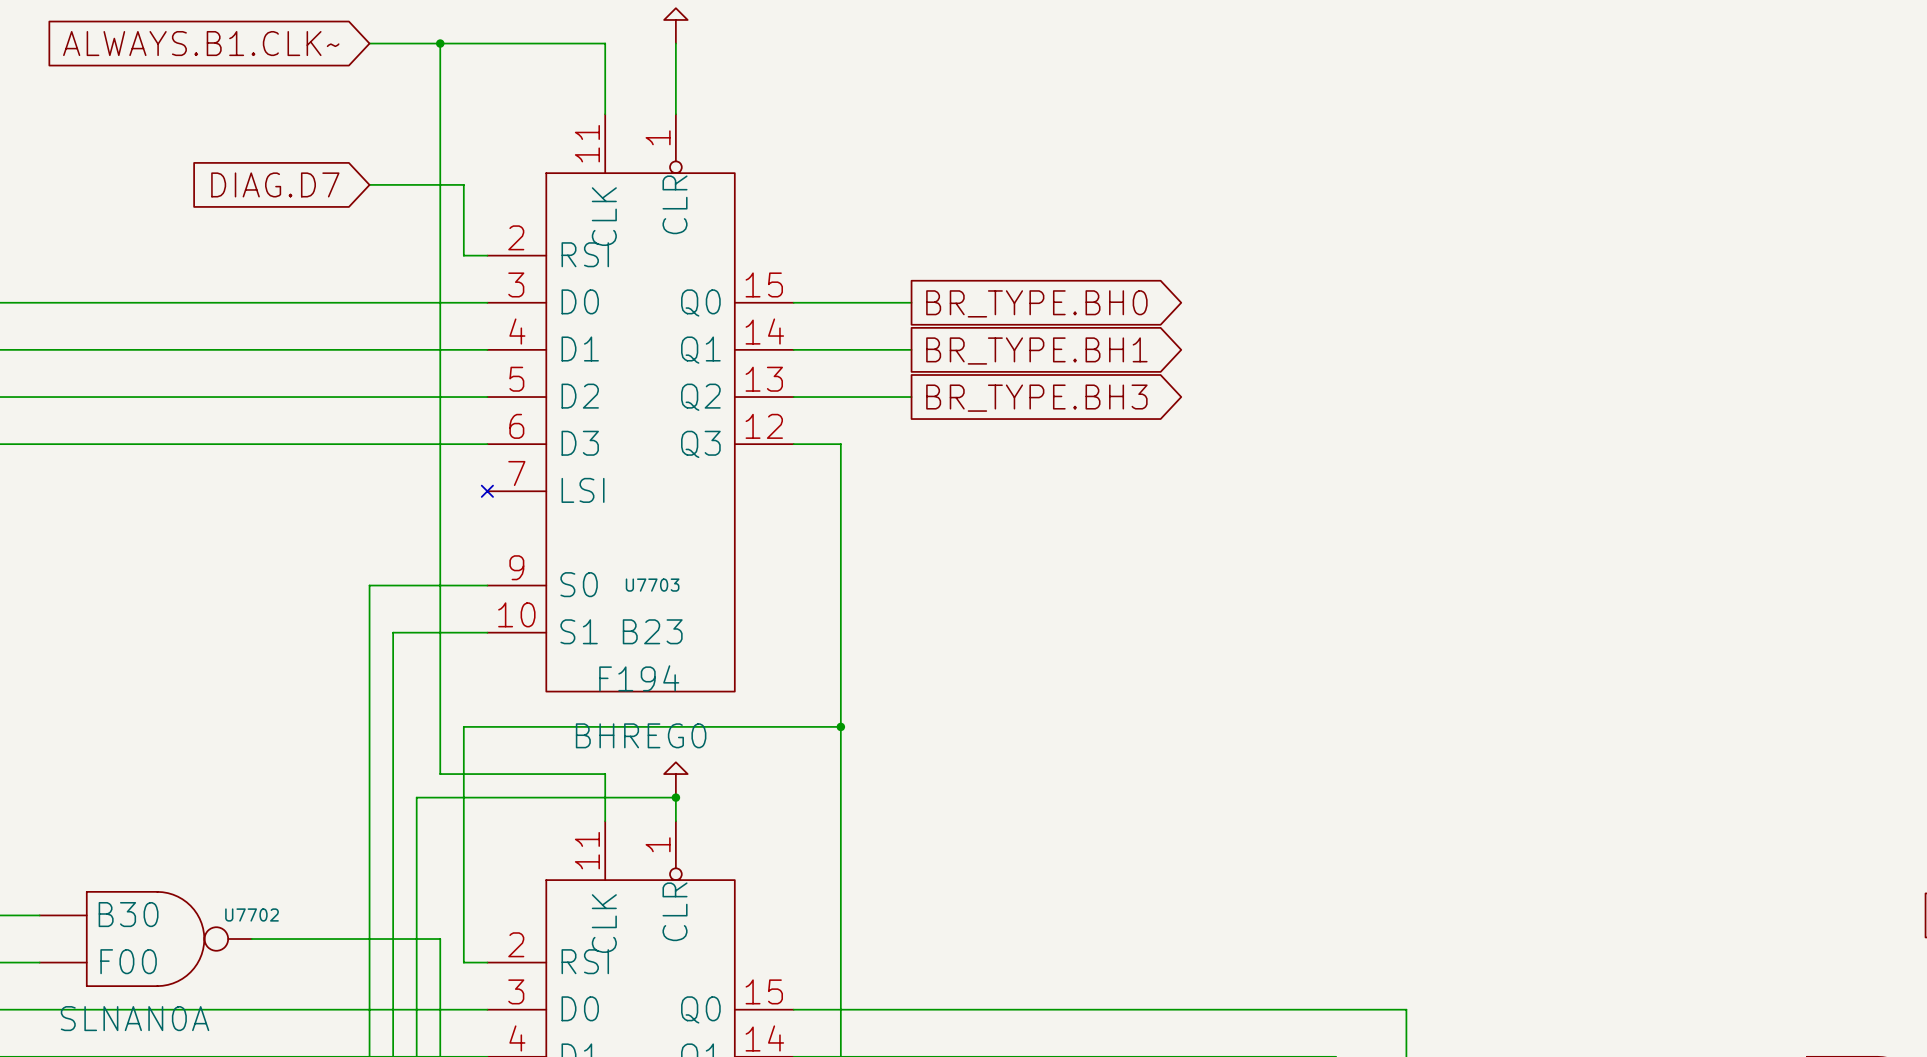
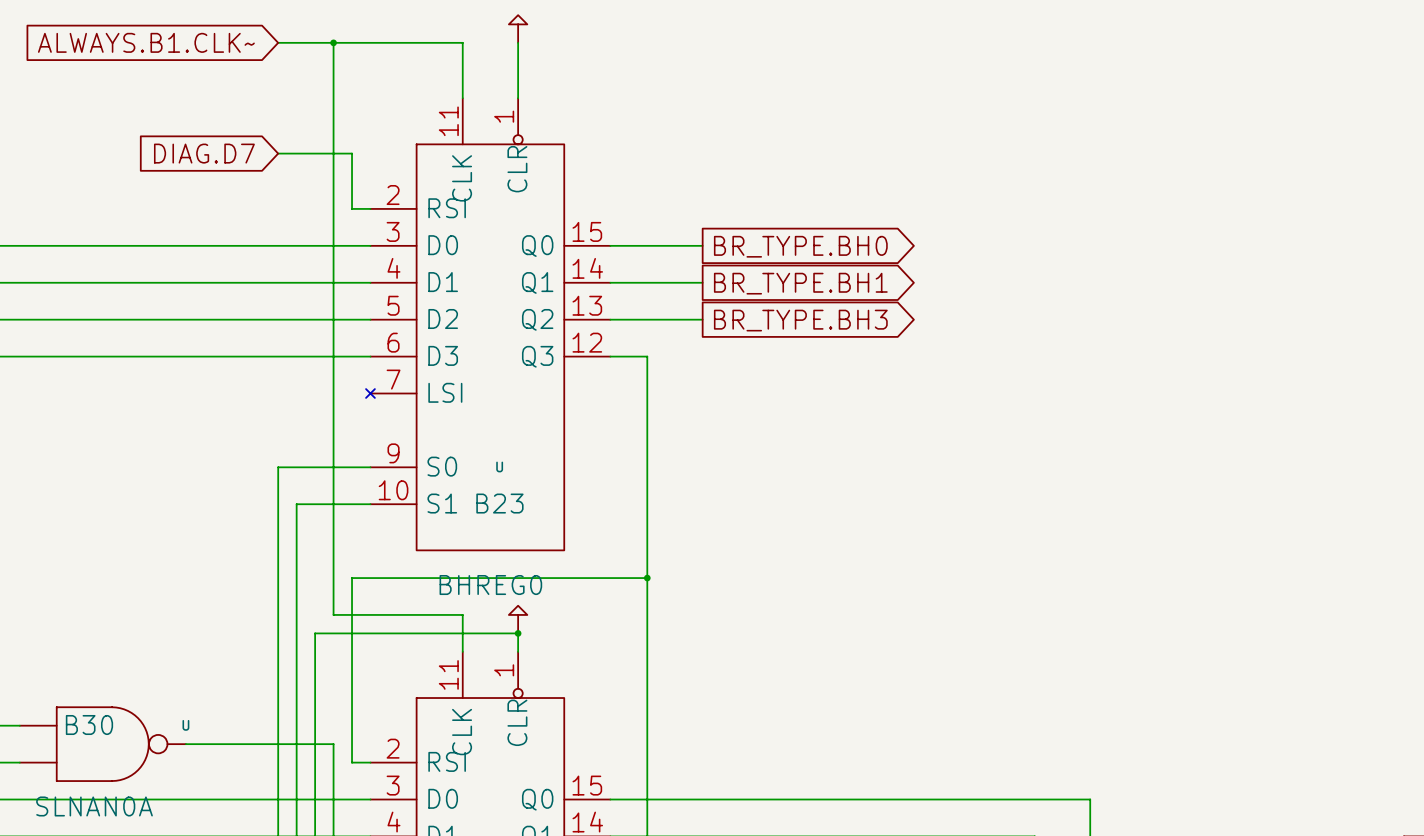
U7703 name: U7703 (652, 585) -> U (499, 466)
U7703 value: F194 (639, 678) -> none
U7702 name: U7702 (252, 915) -> U (185, 725)
U7702 value: F00 (128, 961) -> none

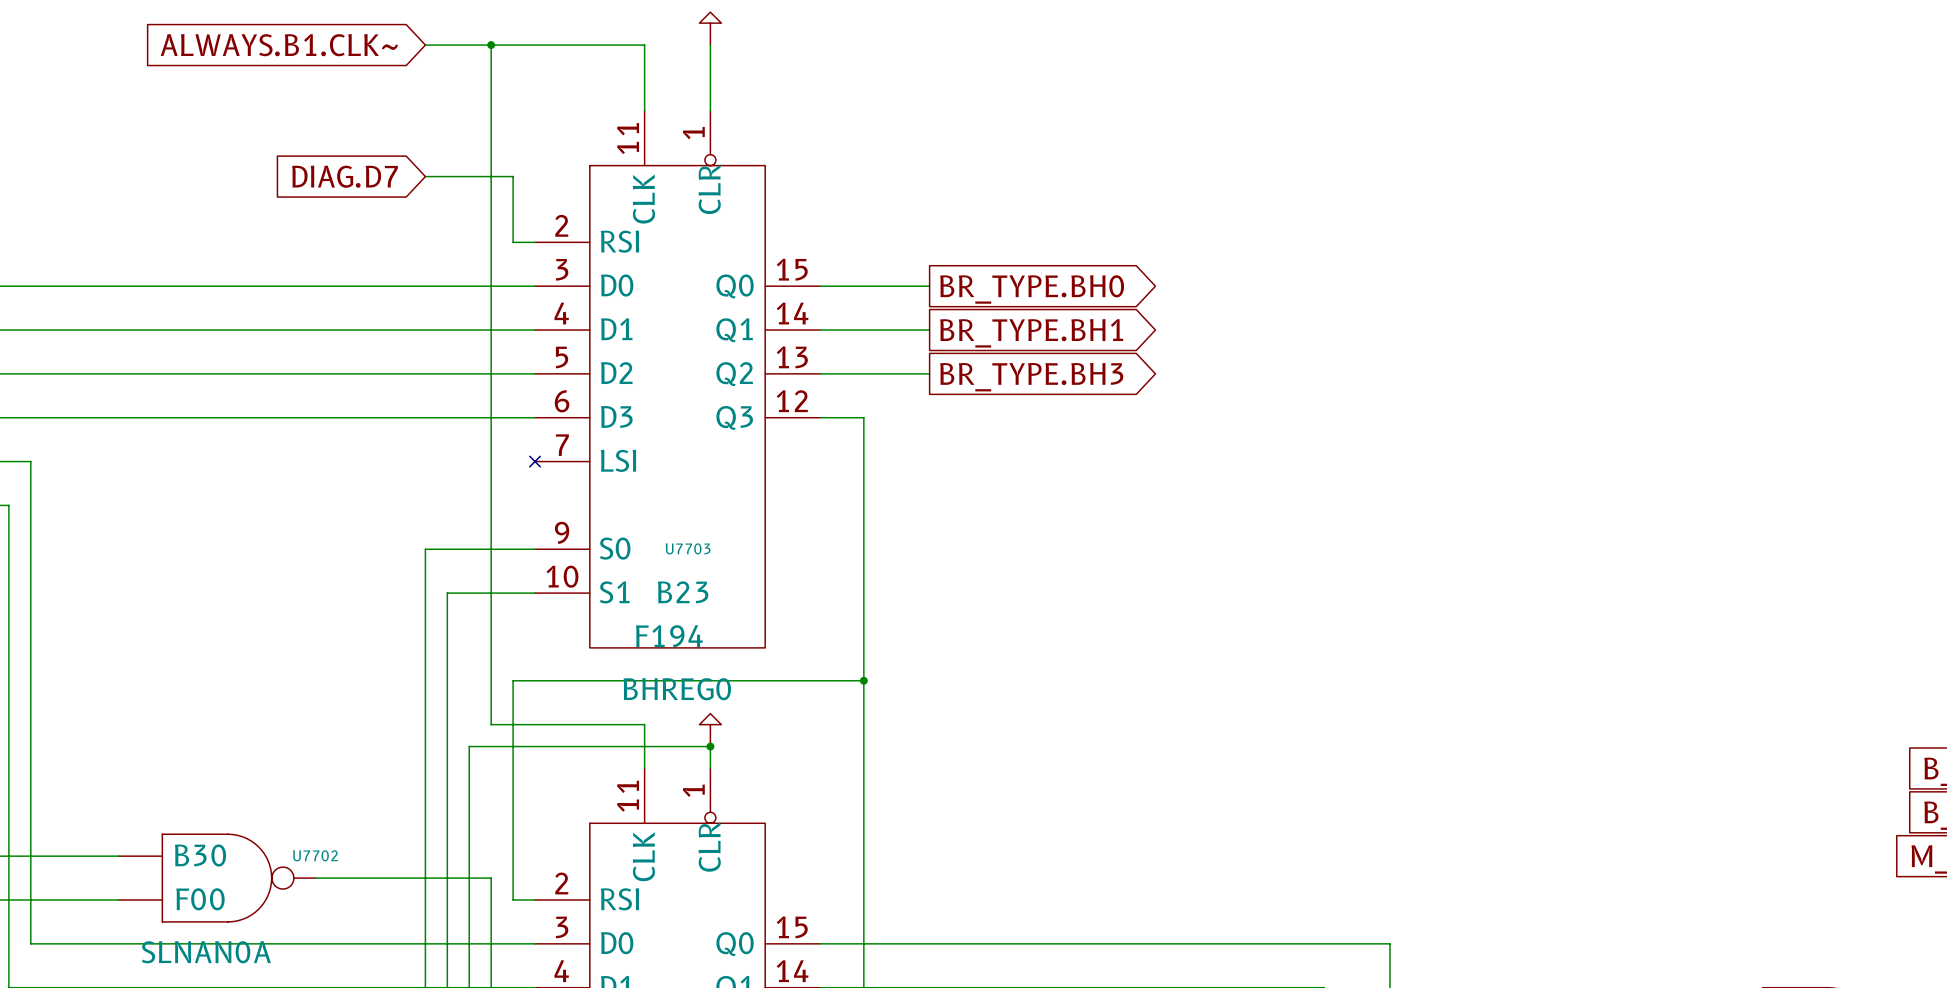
U name: U (499, 466) -> U7703 (688, 548)
U value: none -> F194 (669, 636)
U name: U (185, 725) -> U7702 (315, 855)
U value: none -> F00 (200, 899)

